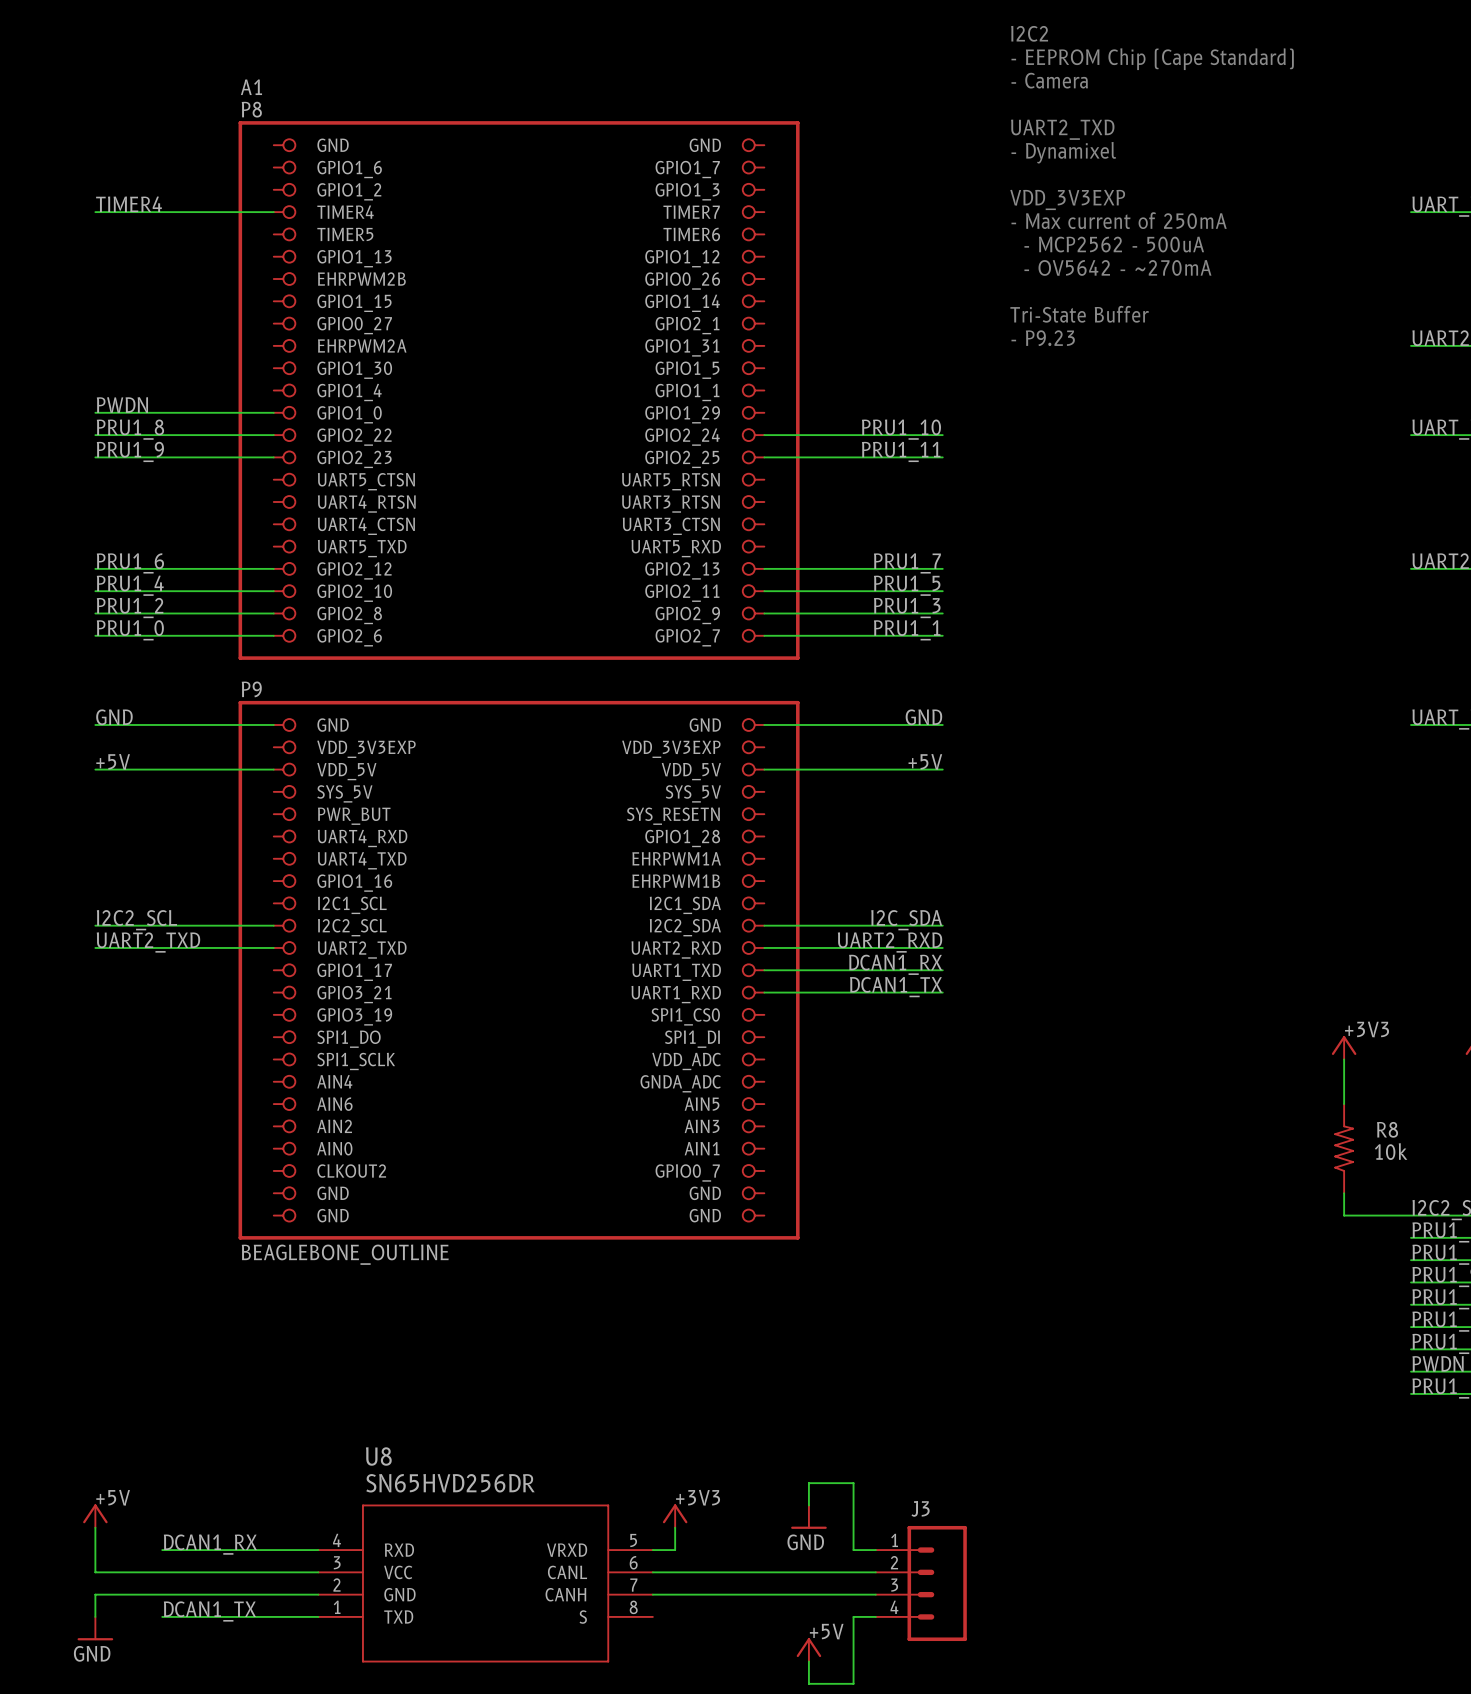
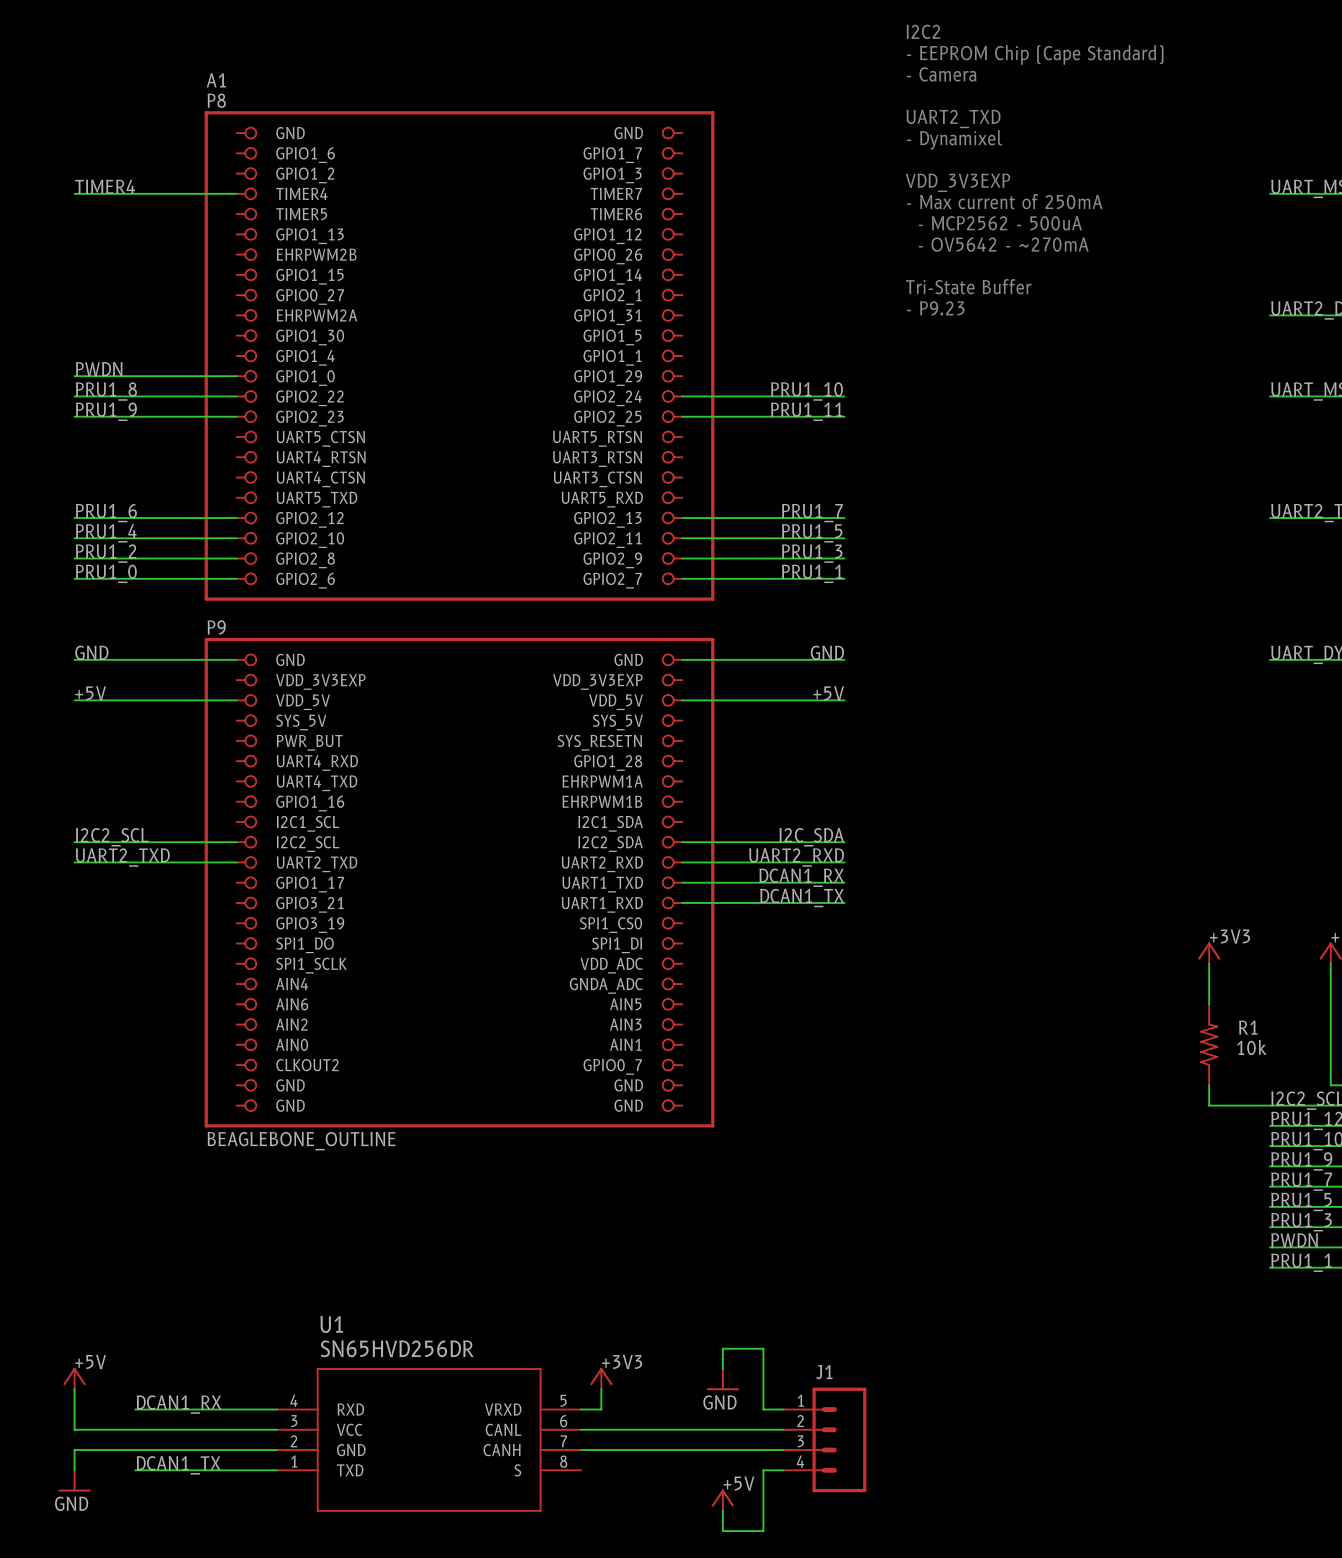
R8 name: R8 (1387, 1129) -> R1 (1248, 1027)
U8 name: U8 (378, 1456) -> U1 (331, 1324)
J3 name: J3 (920, 1508) -> J1 (824, 1372)

